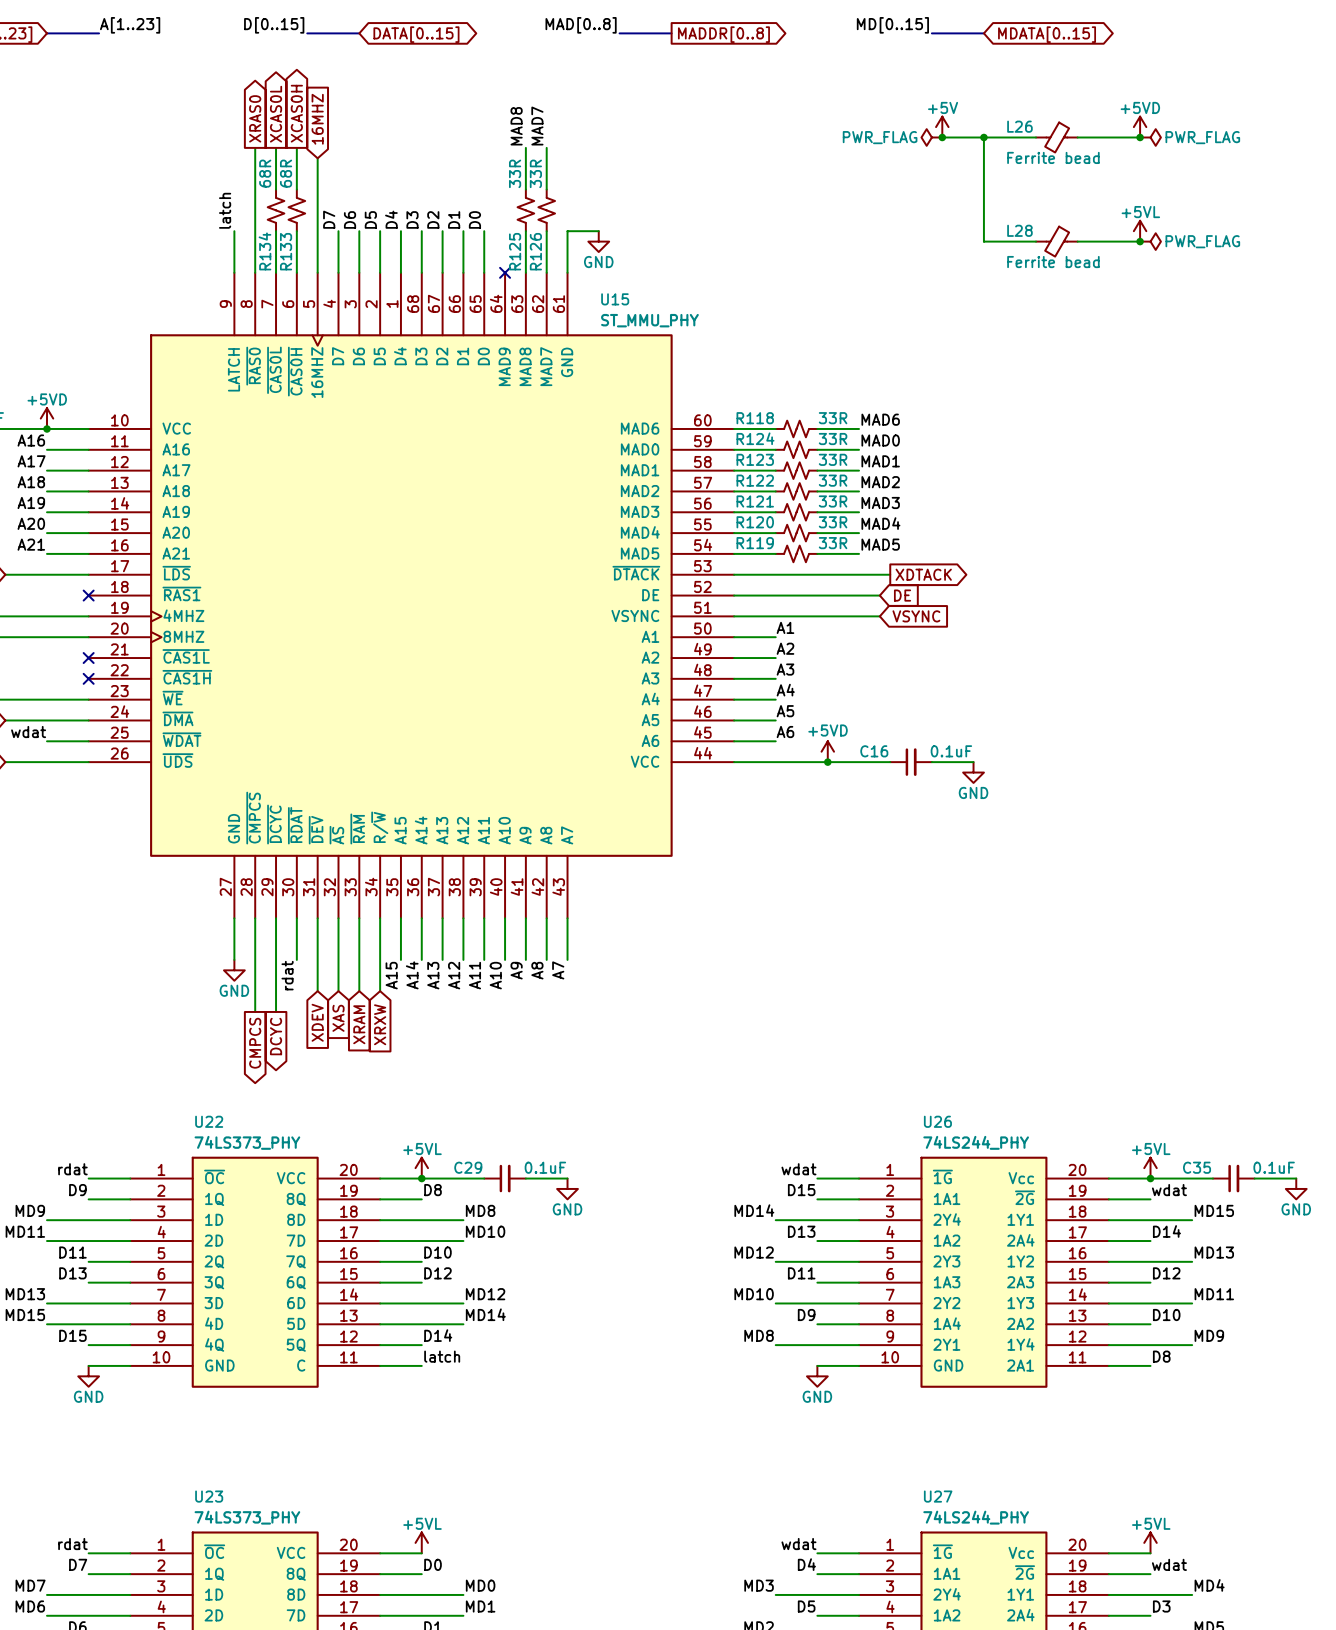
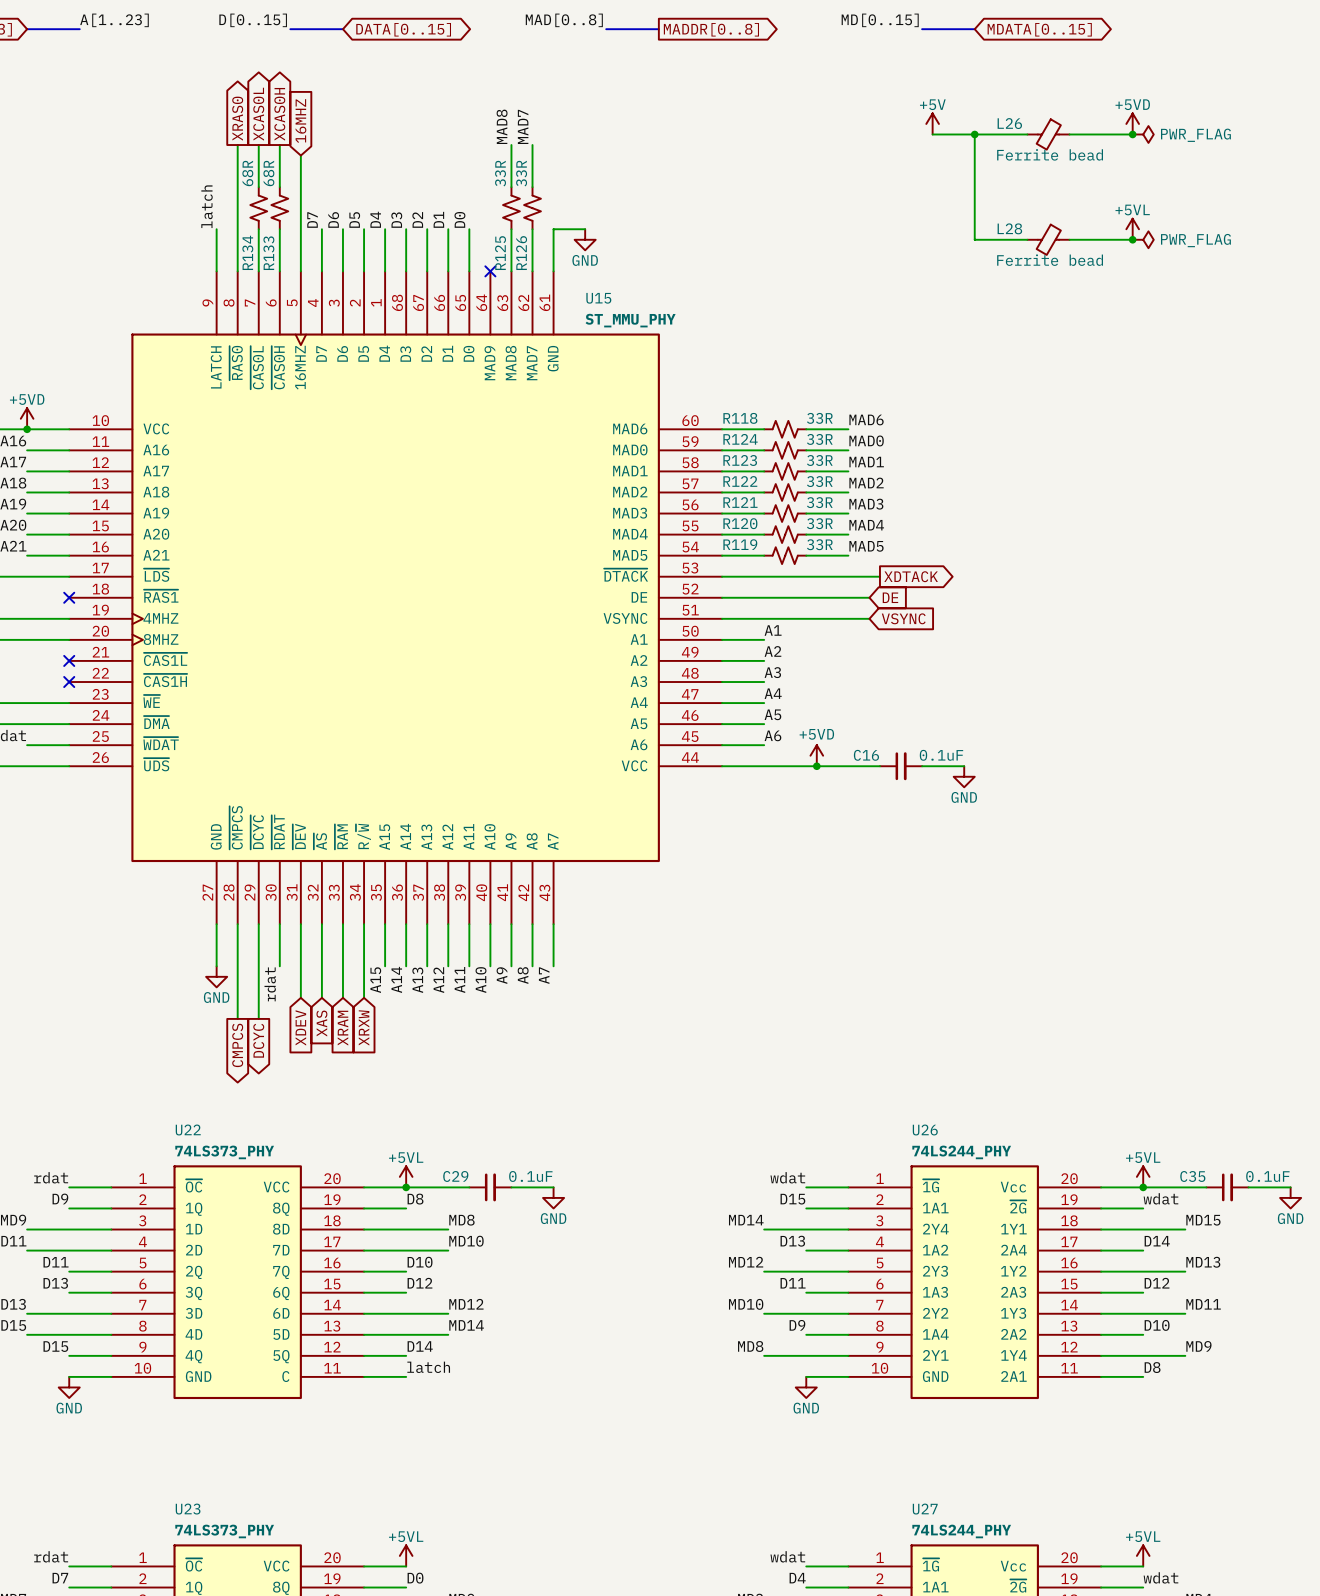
power symbol: PWR_FLAG (931, 137) -> none
junction: (942, 137) -> none

